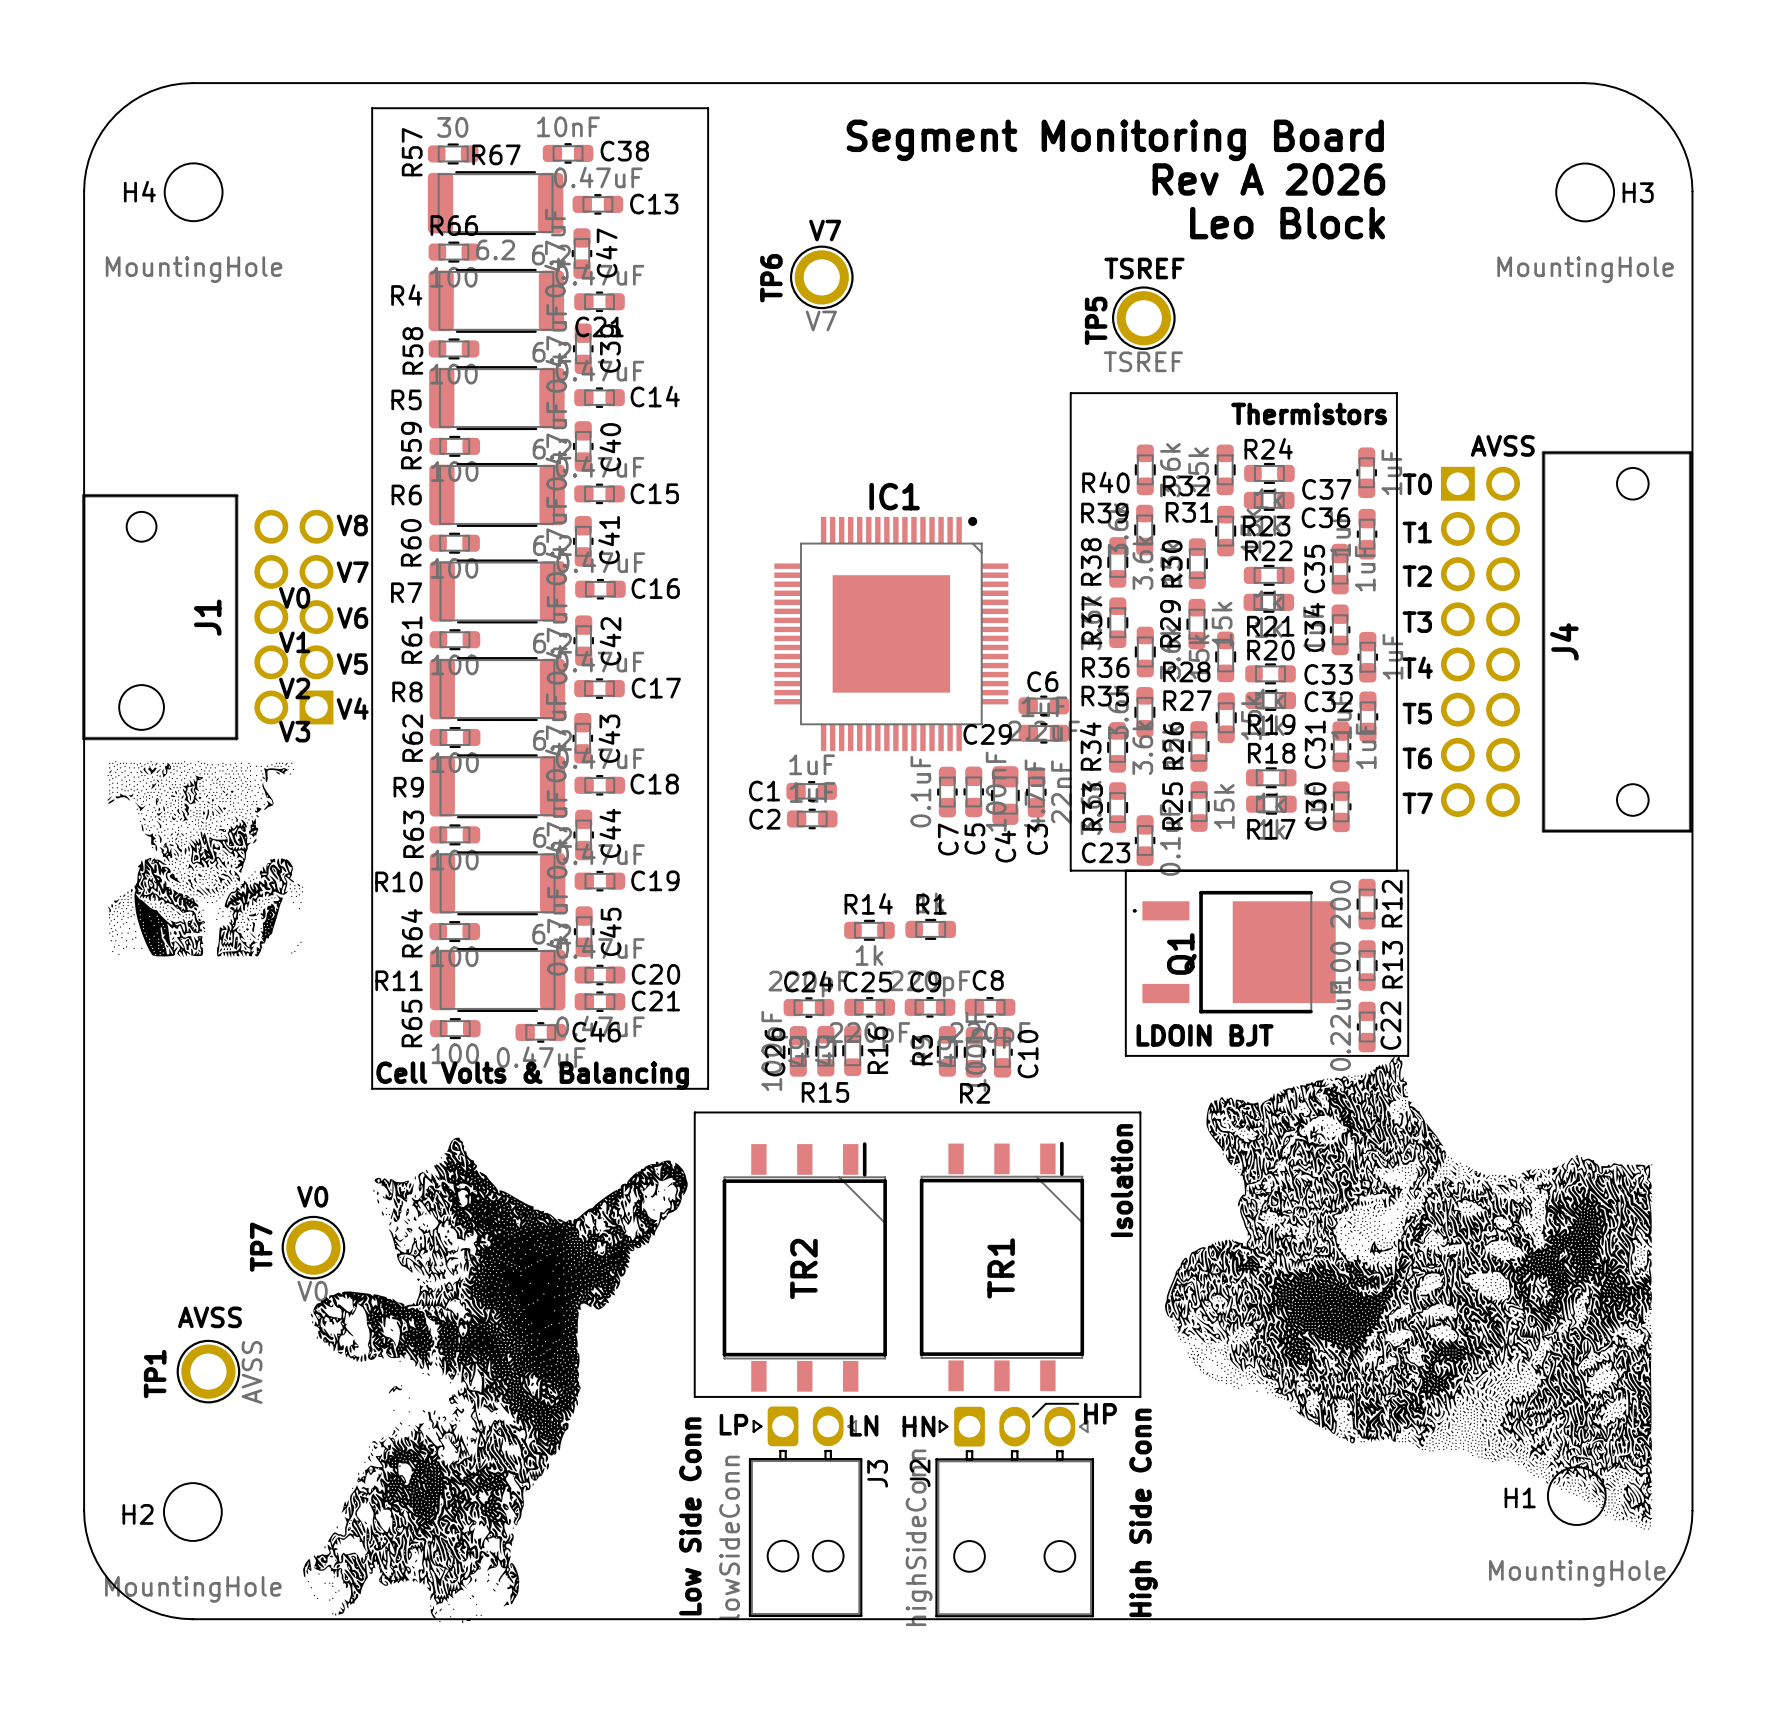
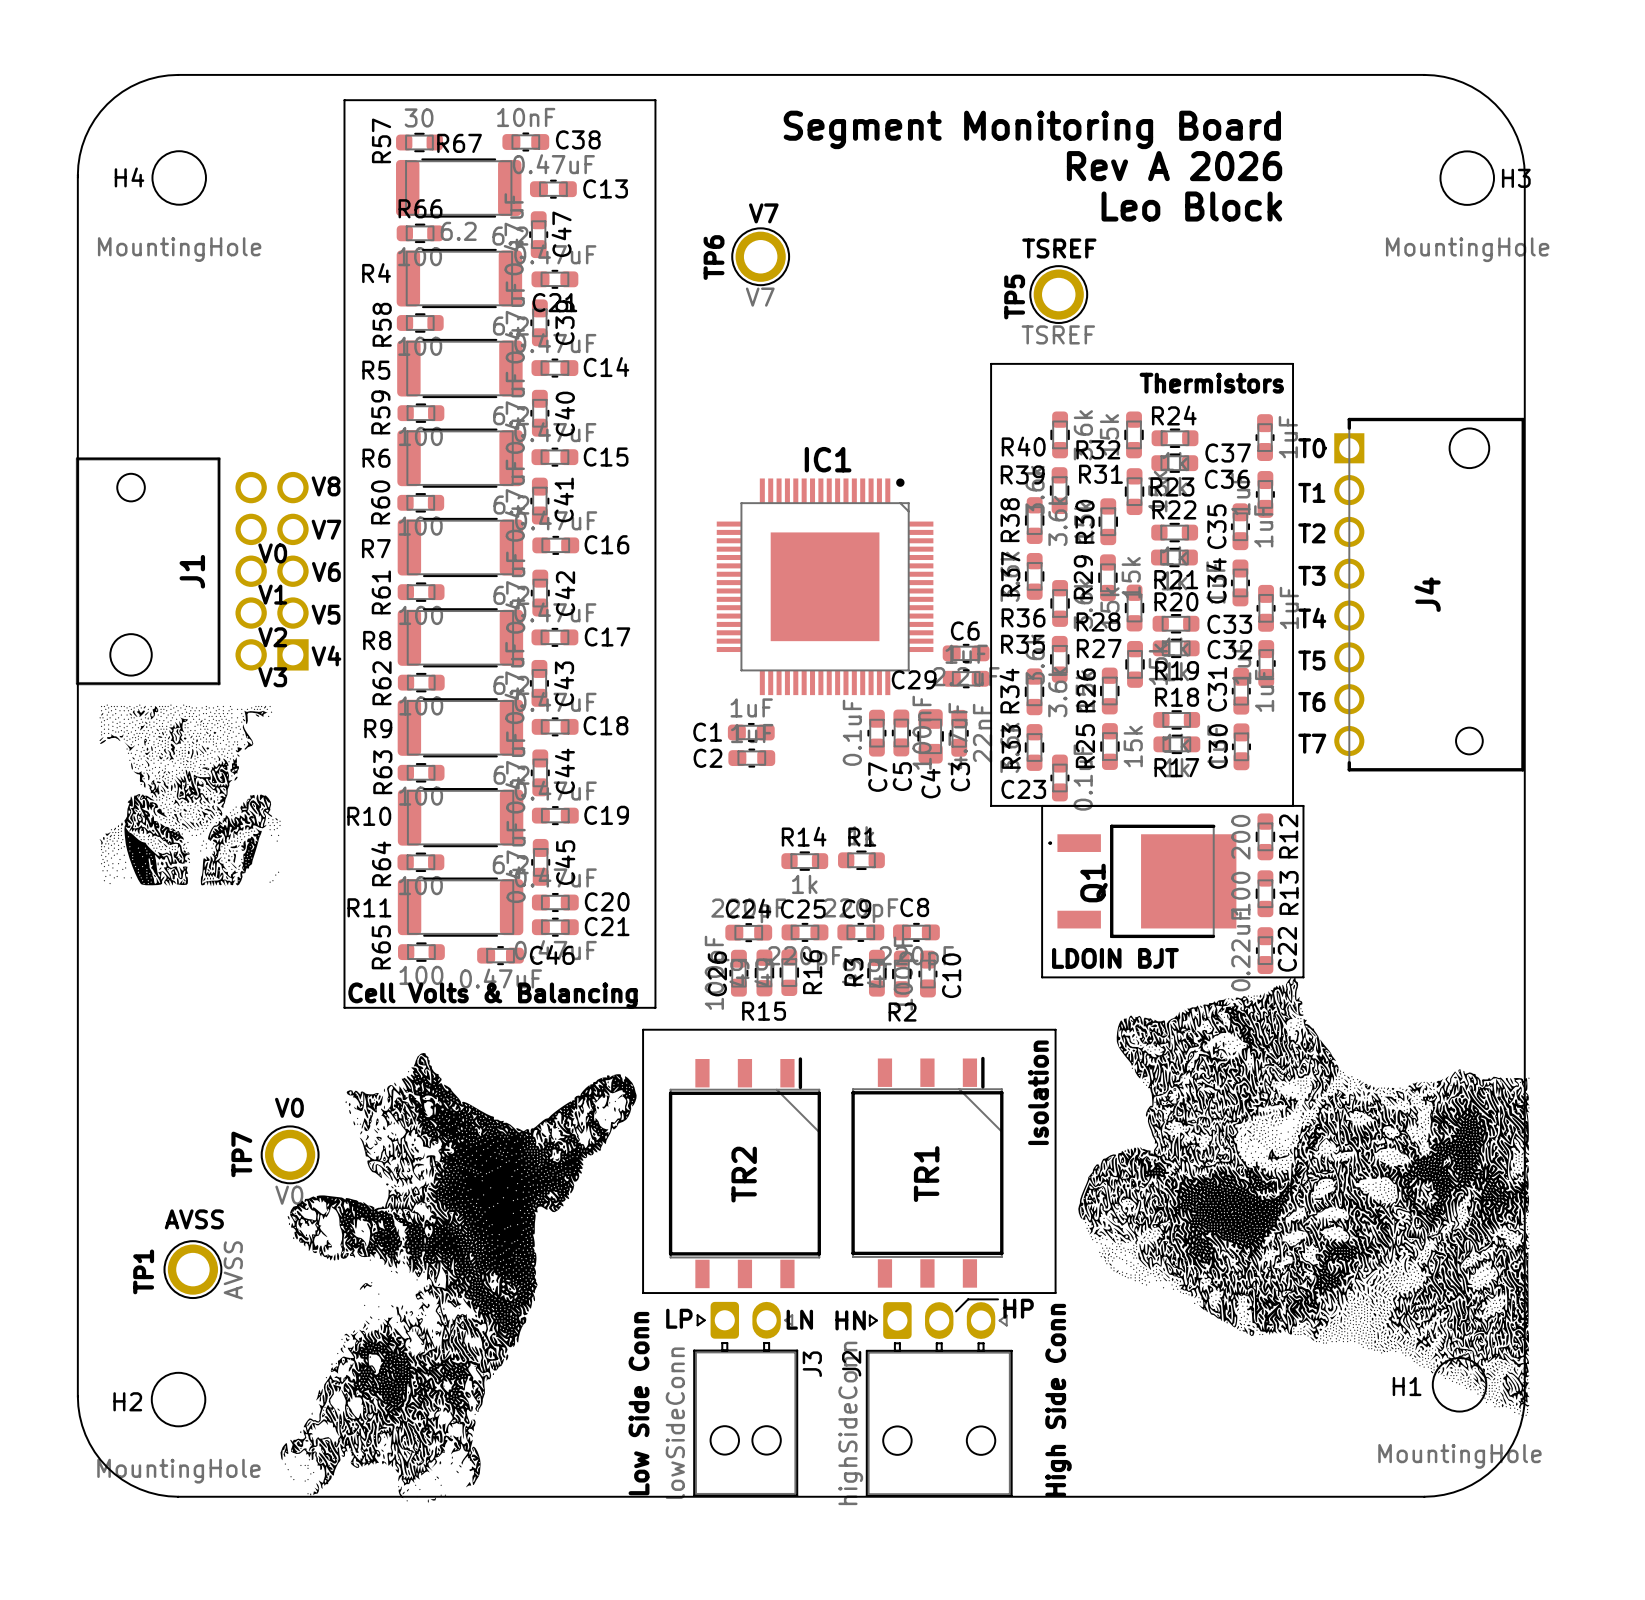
board edge: (84, 191) (86, 170) (92, 150) (102, 131) (115, 114) (132, 101) (151, 91) (181, 83) (1584, 83) (1615, 87) (1635, 95) (1652, 107) (1667, 122) (1684, 150) (1690, 170) (1692, 191) (1692, 1510) (1690, 1531) (1684, 1552) (1674, 1571) (1660, 1587) (1644, 1600) (1625, 1610) (1594, 1618) (192, 1619) (171, 1617) (151, 1610) (132, 1600) (115, 1587) (102, 1571) (92, 1552) (86, 1531) (84, 1508) -> (77, 177) (79, 155) (85, 136) (94, 119) (107, 104) (122, 91) (139, 82) (158, 76) (178, 74) (1434, 75) (1453, 79) (1471, 86) (1495, 104) (1507, 119) (1517, 136) (1522, 155) (1524, 175) (1524, 1396) (1522, 1415) (1512, 1443) (1502, 1460) (1488, 1473) (1462, 1489) (1443, 1494) (1424, 1496) (168, 1496) (139, 1489) (122, 1479) (107, 1467) (94, 1452) (85, 1434) (79, 1415) (77, 1396)
text: AVSS (1502, 445) -> none
J4 footprint: [1440, 450, 1693, 833] -> [1323, 417, 1525, 772]

